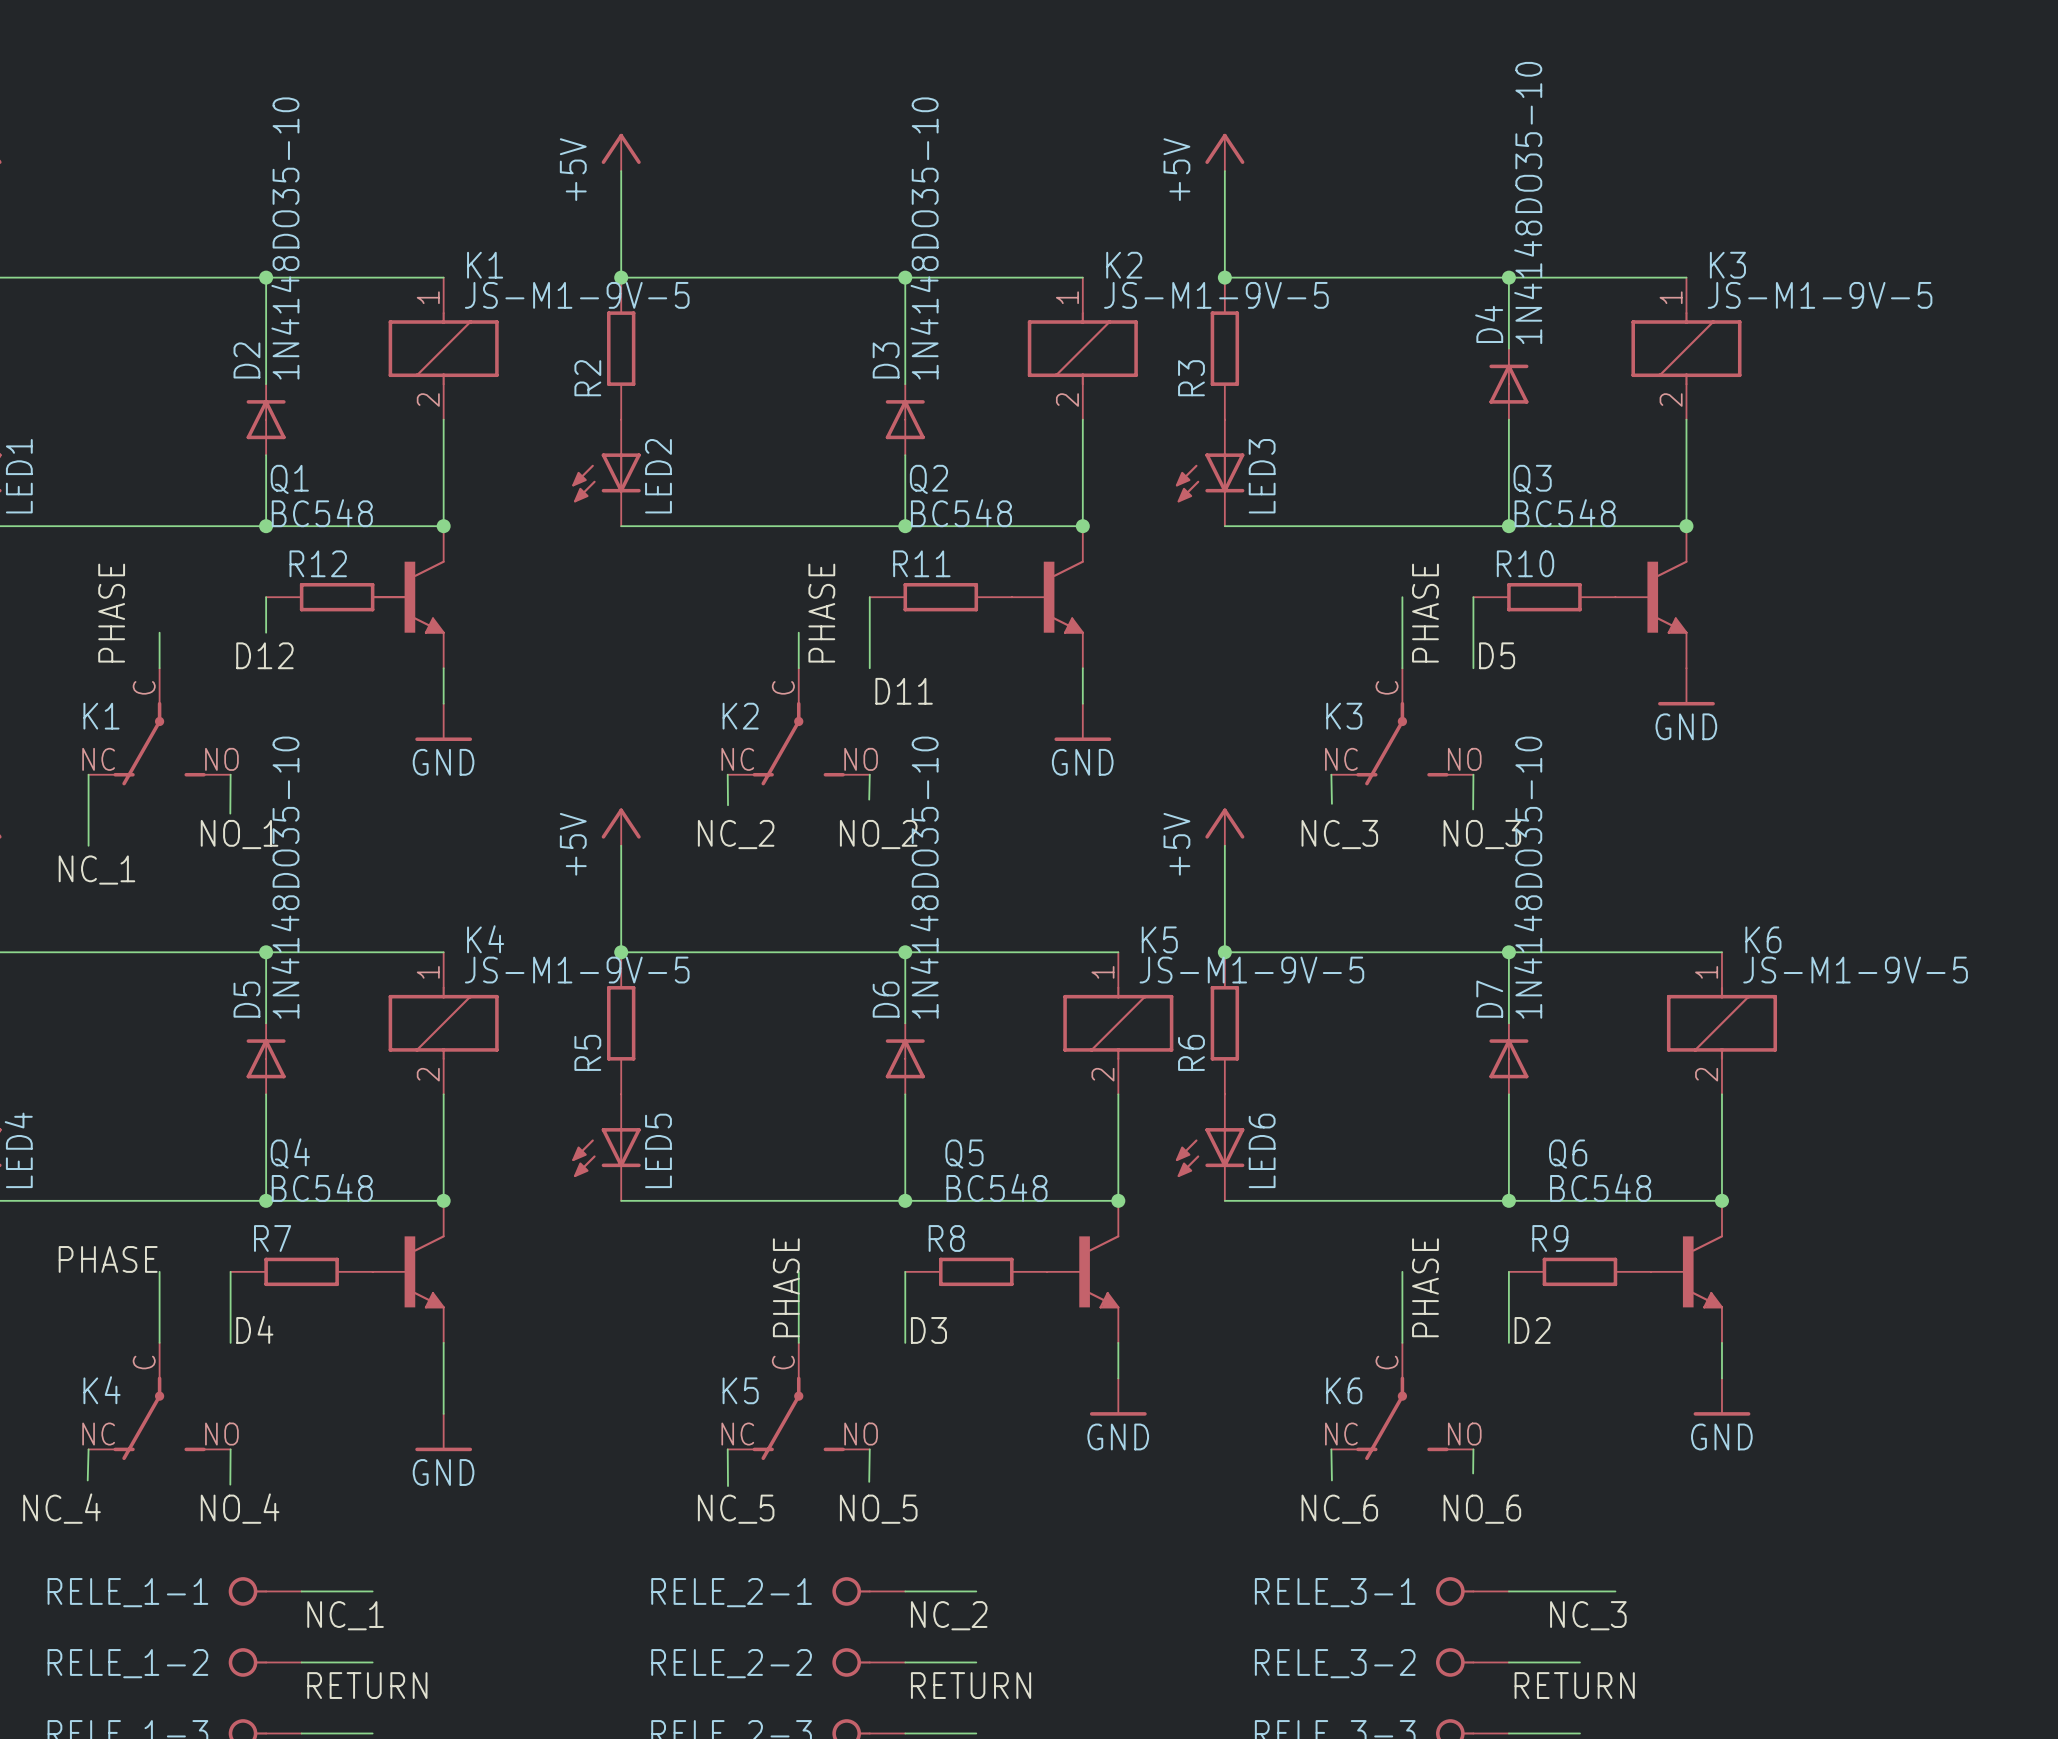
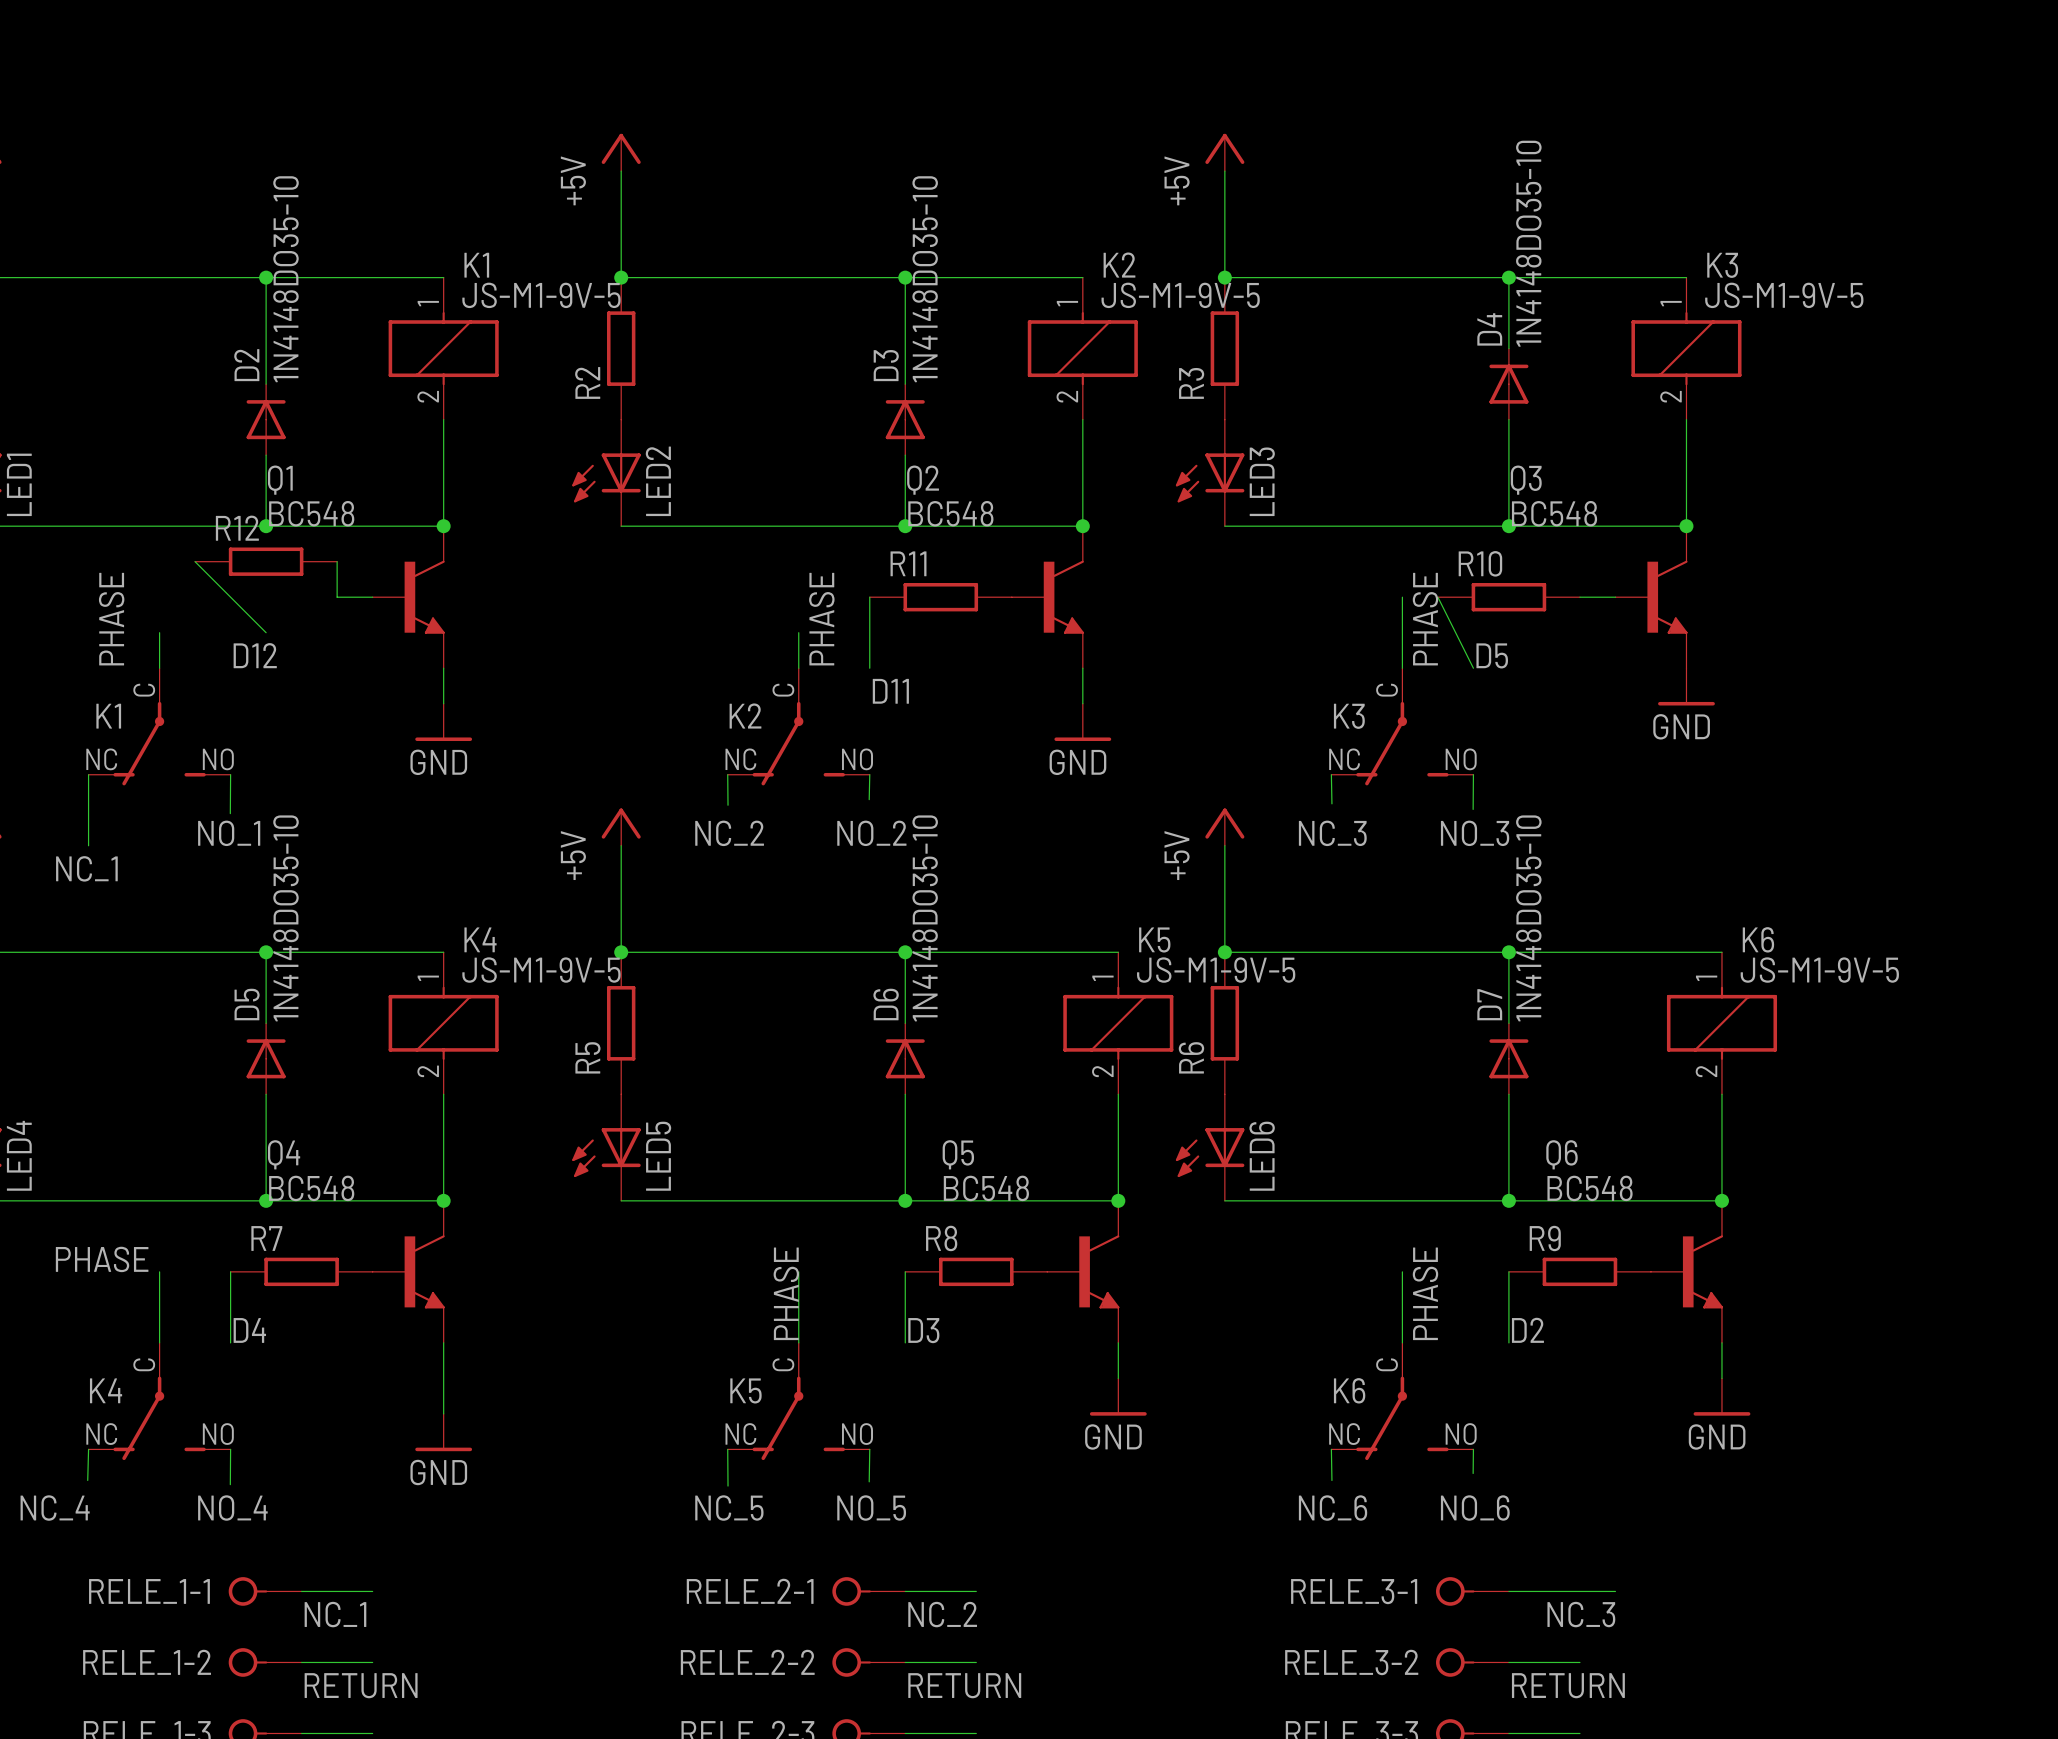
wire: none -> (337, 561) (337, 597) (372, 597)
wire: (266, 597) (266, 632) -> (195, 561) (266, 632)
R12 position: (337, 597) -> (266, 561)
wire: (1473, 597) (1473, 668) -> (1437, 597) (1473, 668)
R10 position: (1544, 597) -> (1508, 597)

